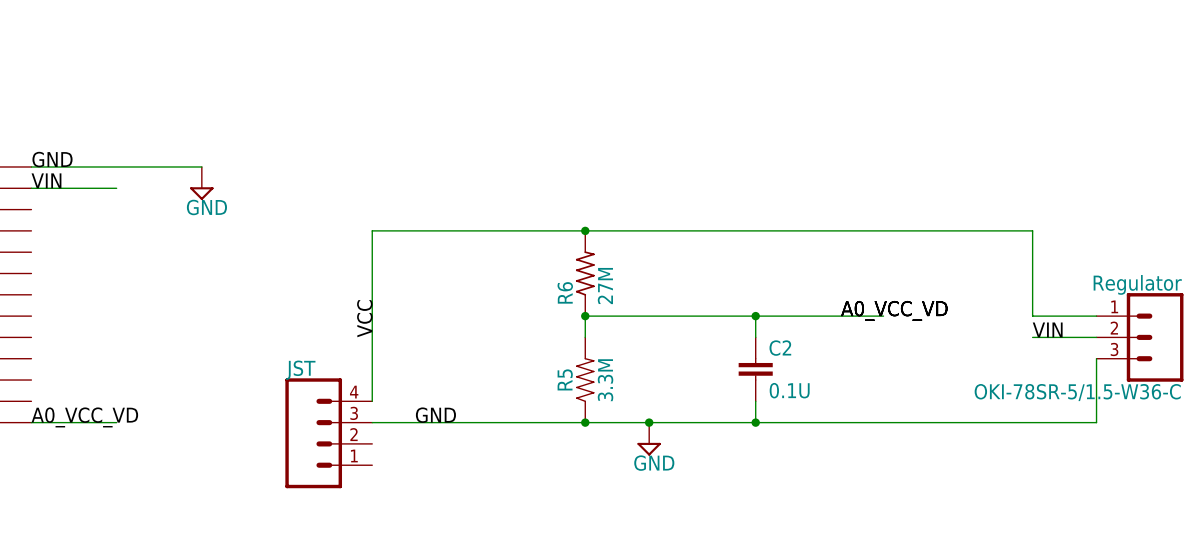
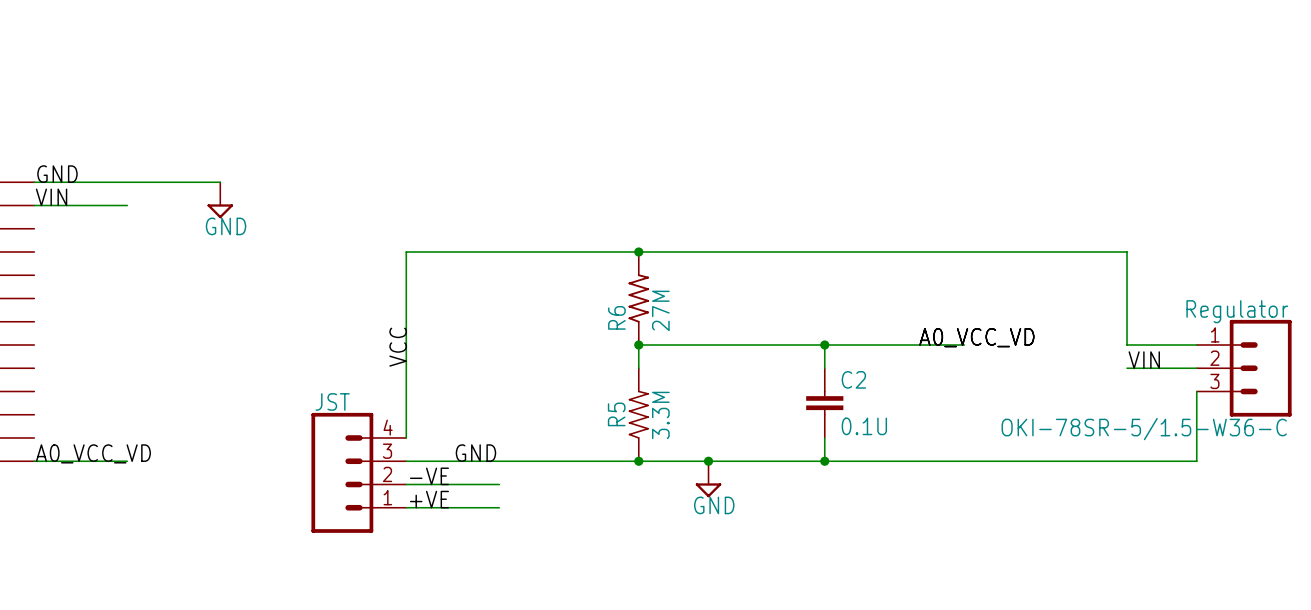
label: none -> -VE (429, 476)
wire: none -> (406, 484) (499, 484)
label: none -> +VE (429, 499)
wire: none -> (406, 507) (499, 507)

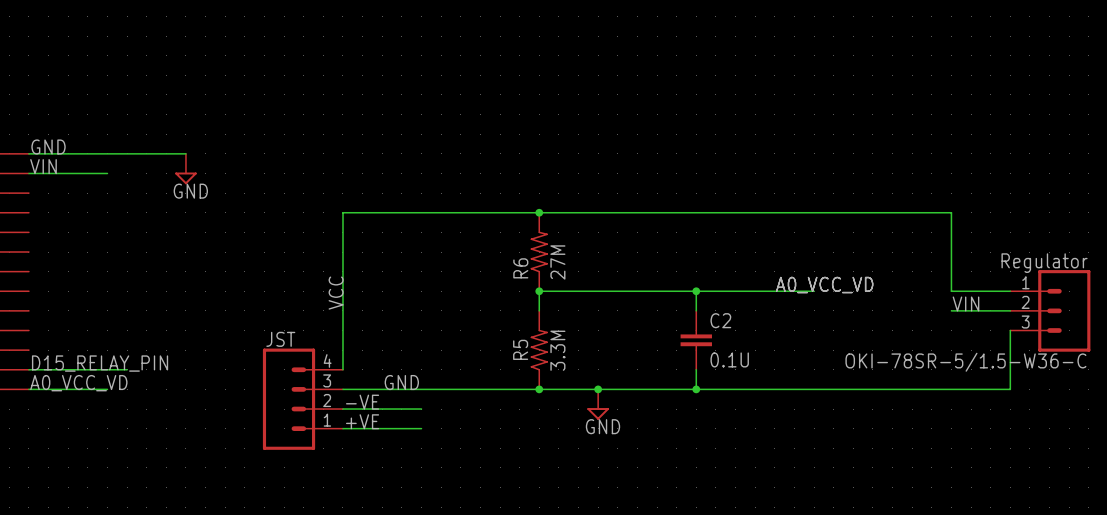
label: none -> D15_RELAY_PIN (100, 363)
wire: none -> (28, 369) (127, 369)

